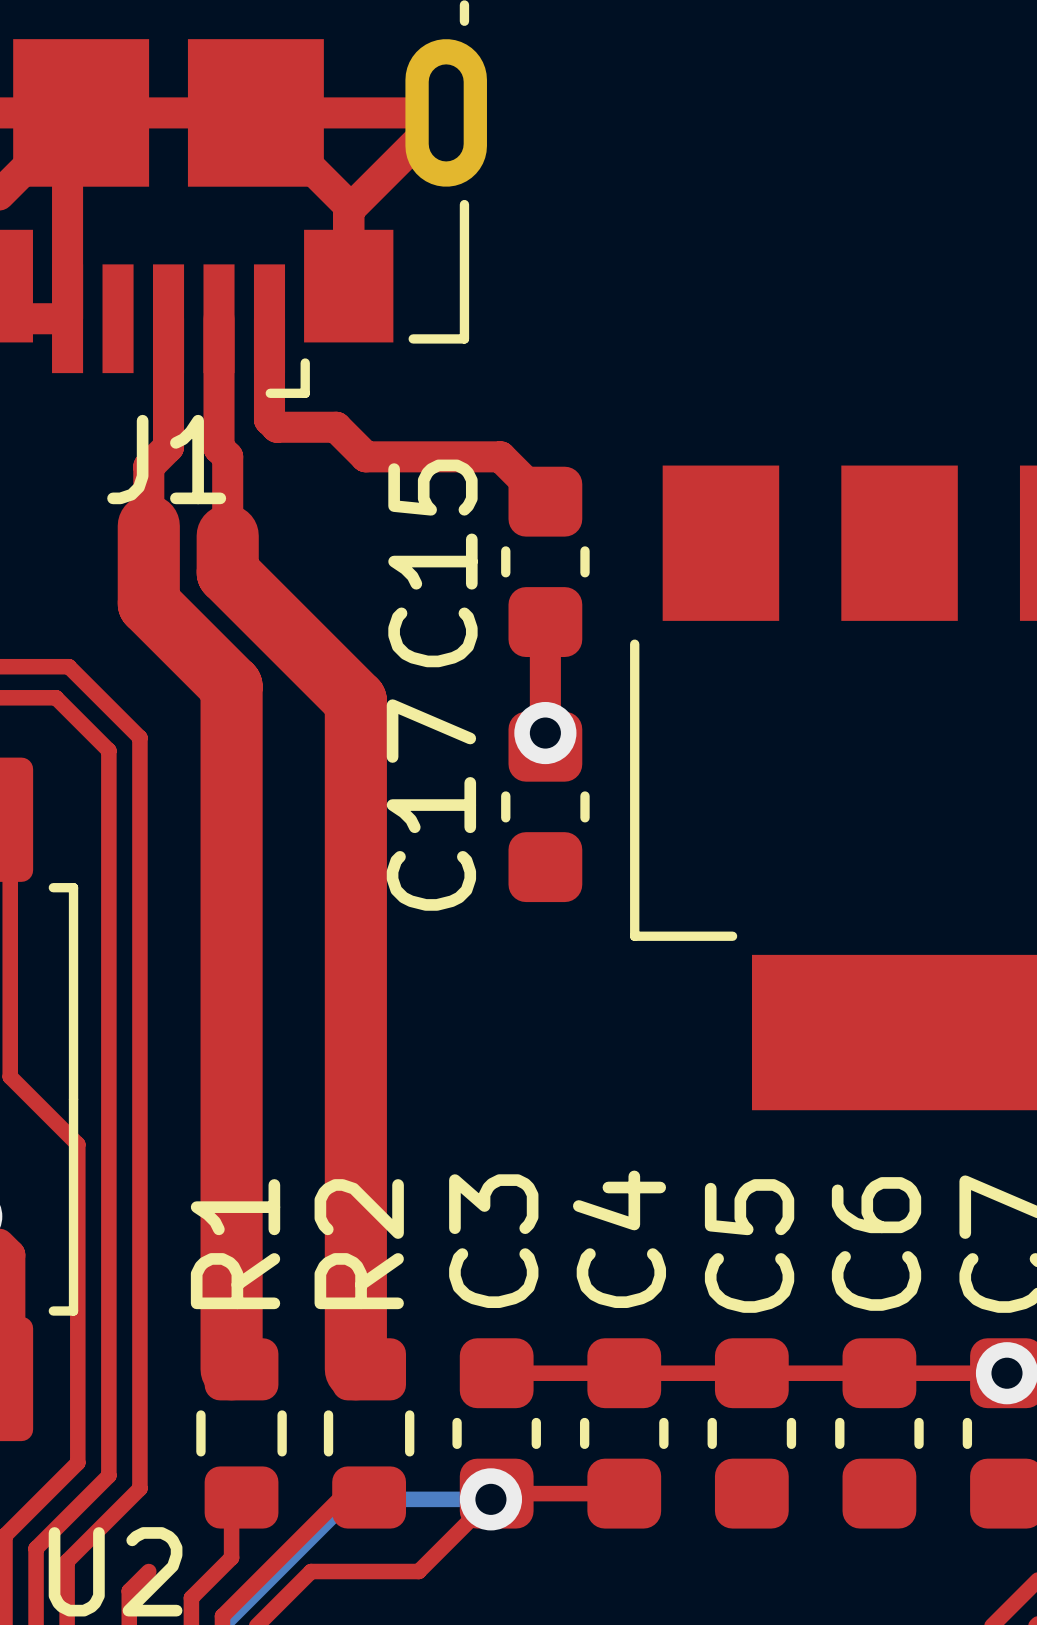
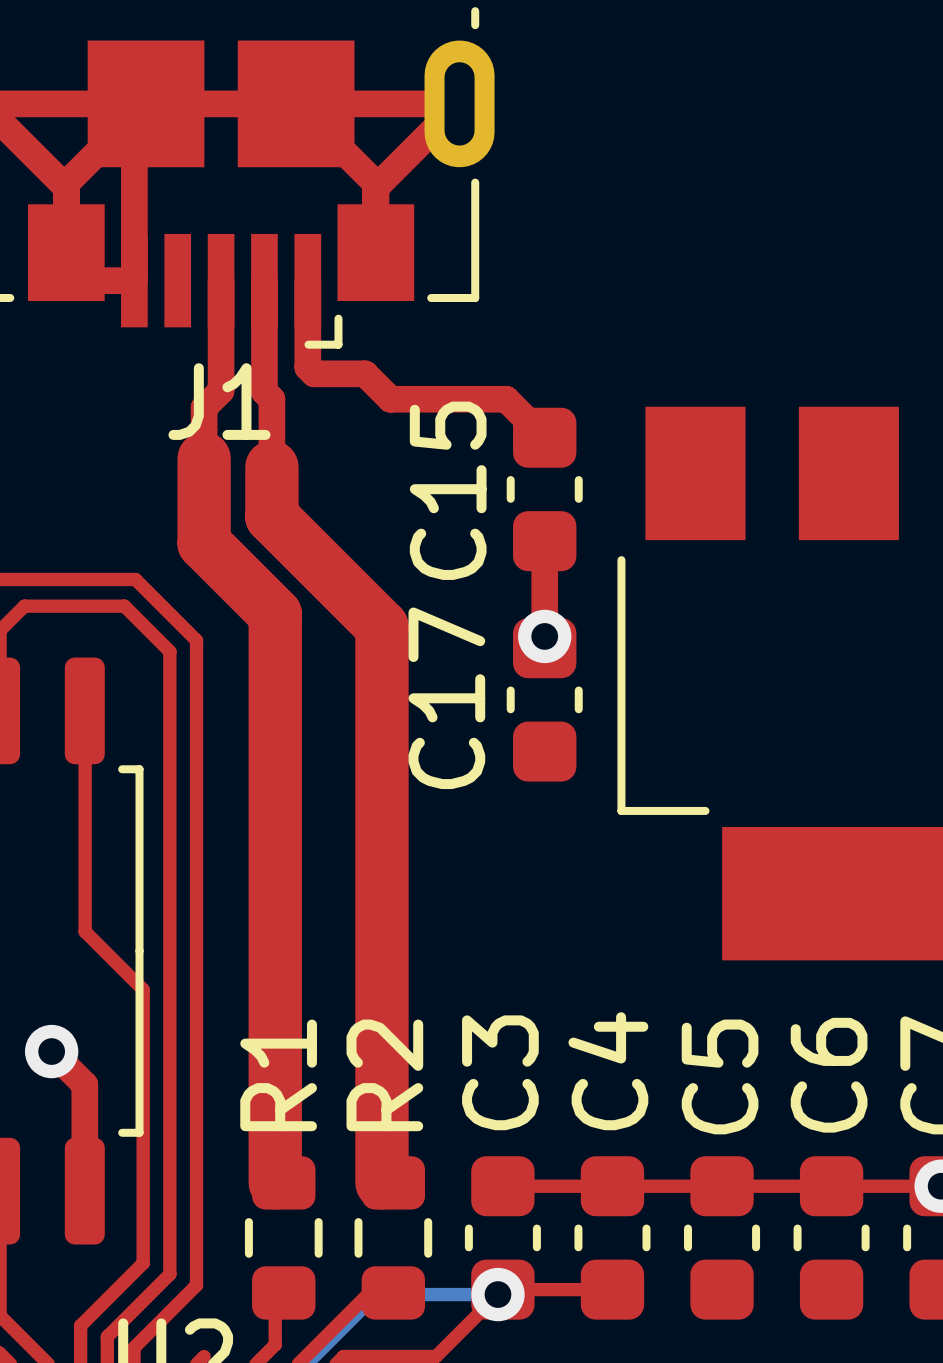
top track: (227, 572) (355, 700) (355, 721) -> (271, 498) (271, 516) (381, 626)
top track: (148, 603) (231, 686) (231, 707) -> (204, 525) (204, 543) (275, 614)

